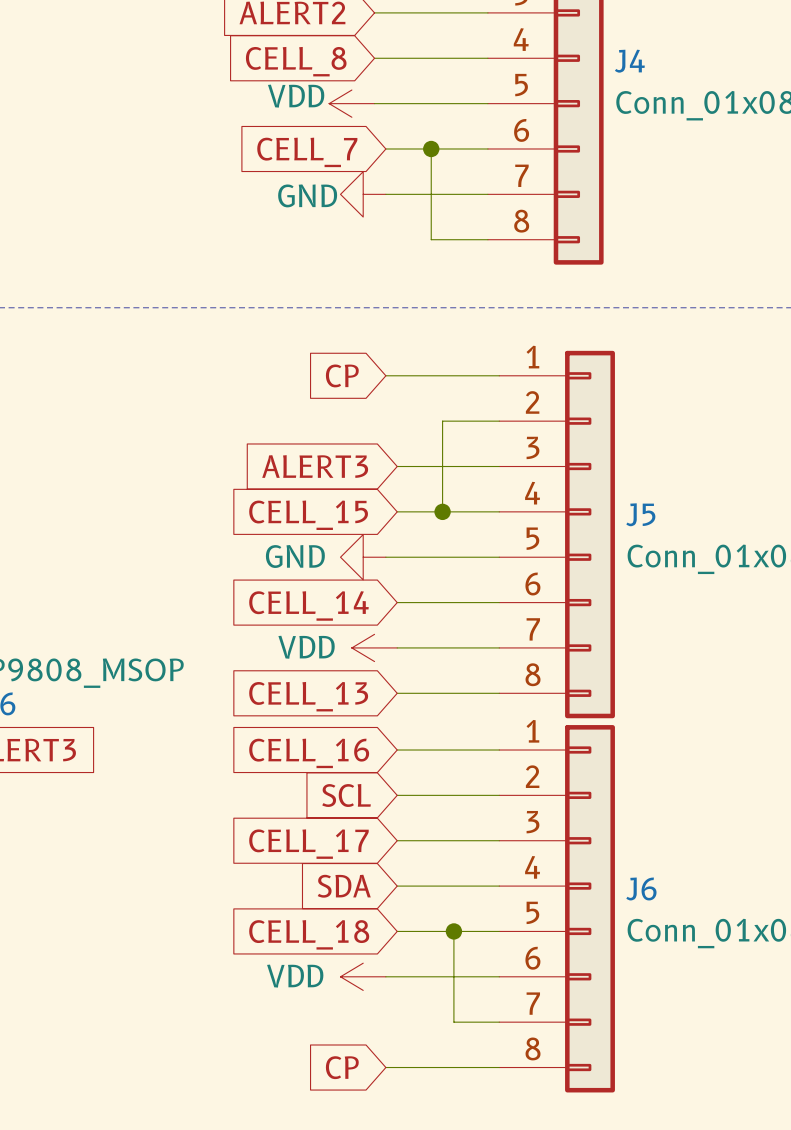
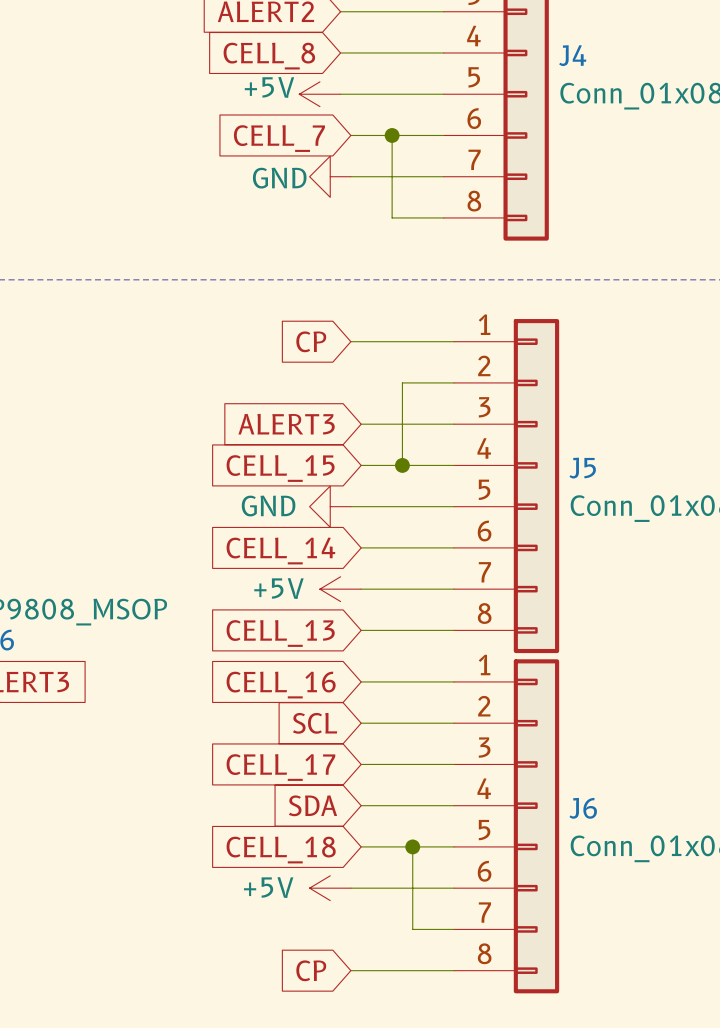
power symbol: VDD (351, 103) -> +5V (319, 94)
power symbol: VDD (374, 647) -> +5V (340, 589)
power symbol: VDD (363, 976) -> +5V (330, 888)

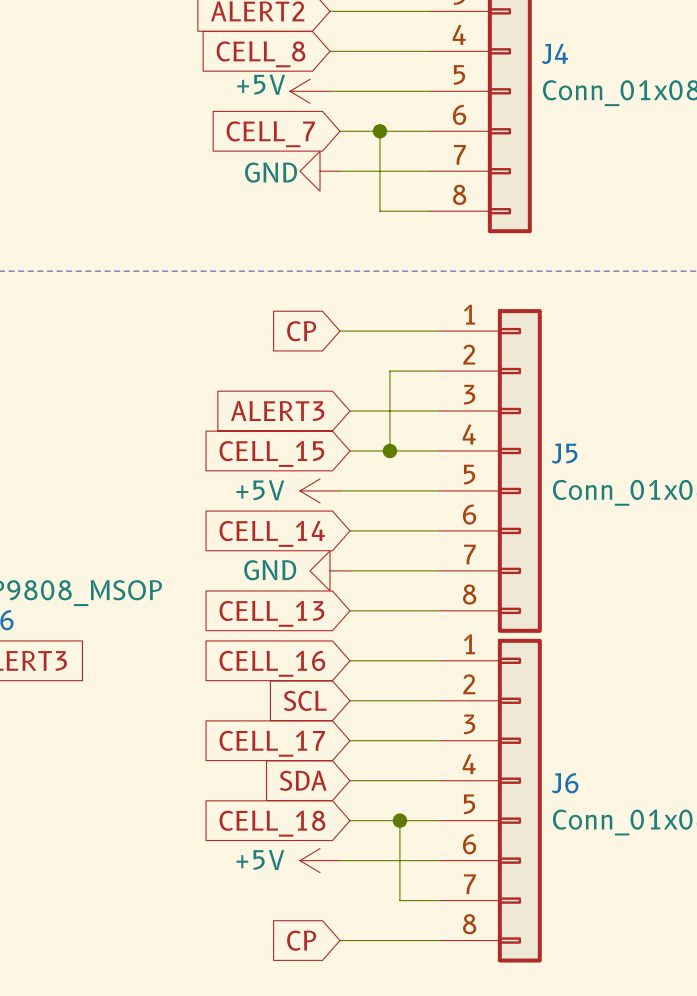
power symbol: GND (330, 506) -> +5V (320, 490)
power symbol: +5V (340, 589) -> GND (330, 570)

